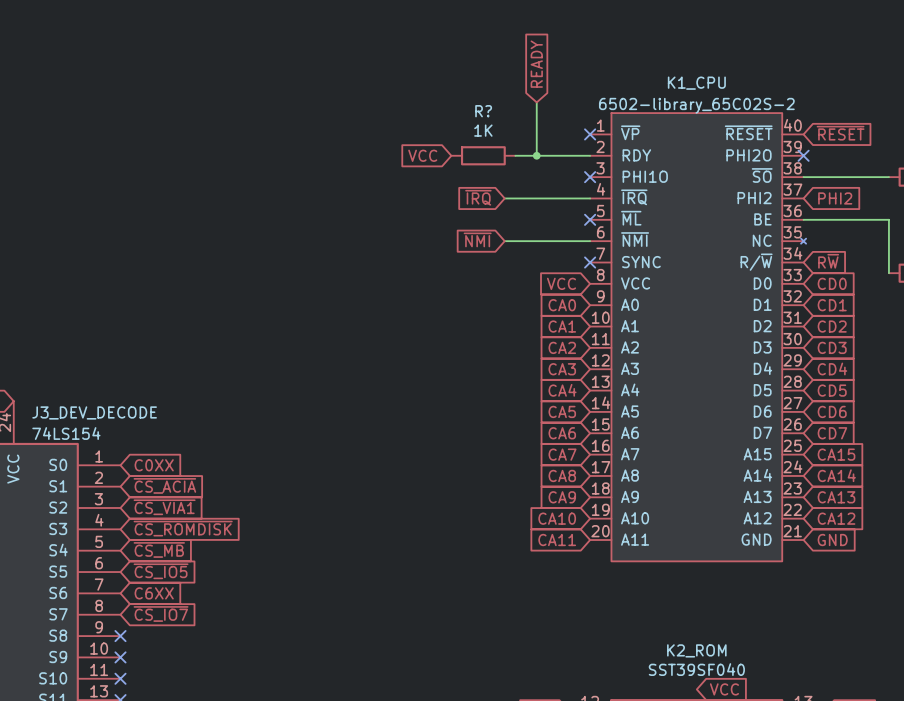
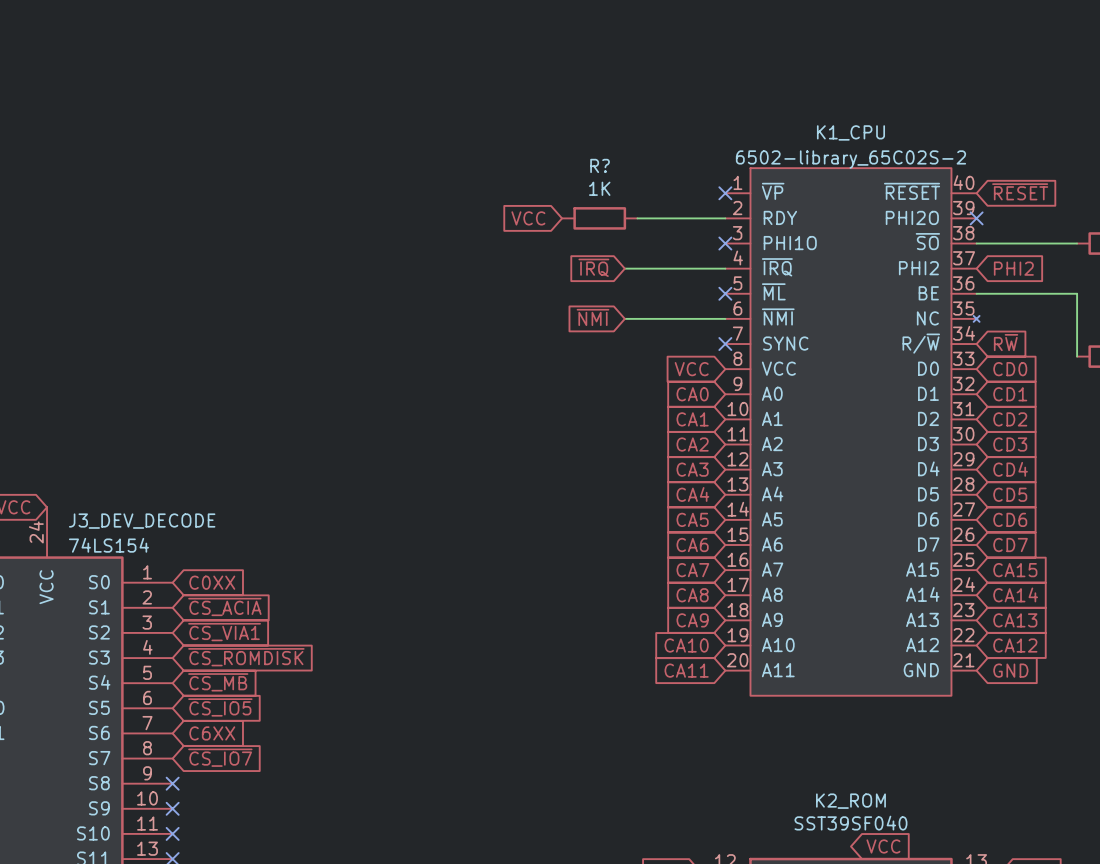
global label: READY (536, 64) -> none
wire: (536, 102) (536, 155) -> none
junction: (536, 155) -> none

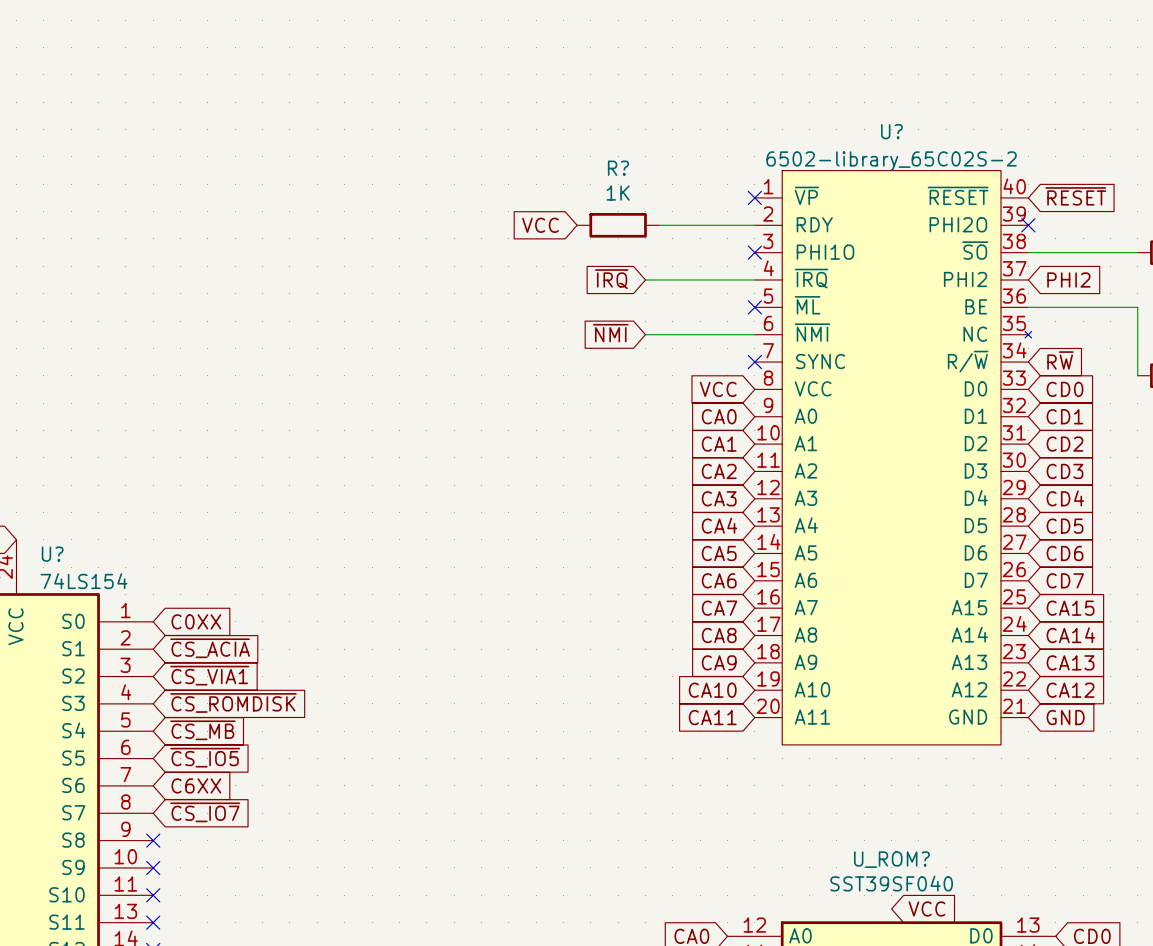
K1_CPU name: K1_CPU (850, 132) -> U? (891, 131)
J3_DEV_DECODE name: J3_DEV_DECODE (142, 521) -> U? (52, 554)
K2_ROM name: K2_ROM (850, 801) -> U_ROM? (891, 859)

